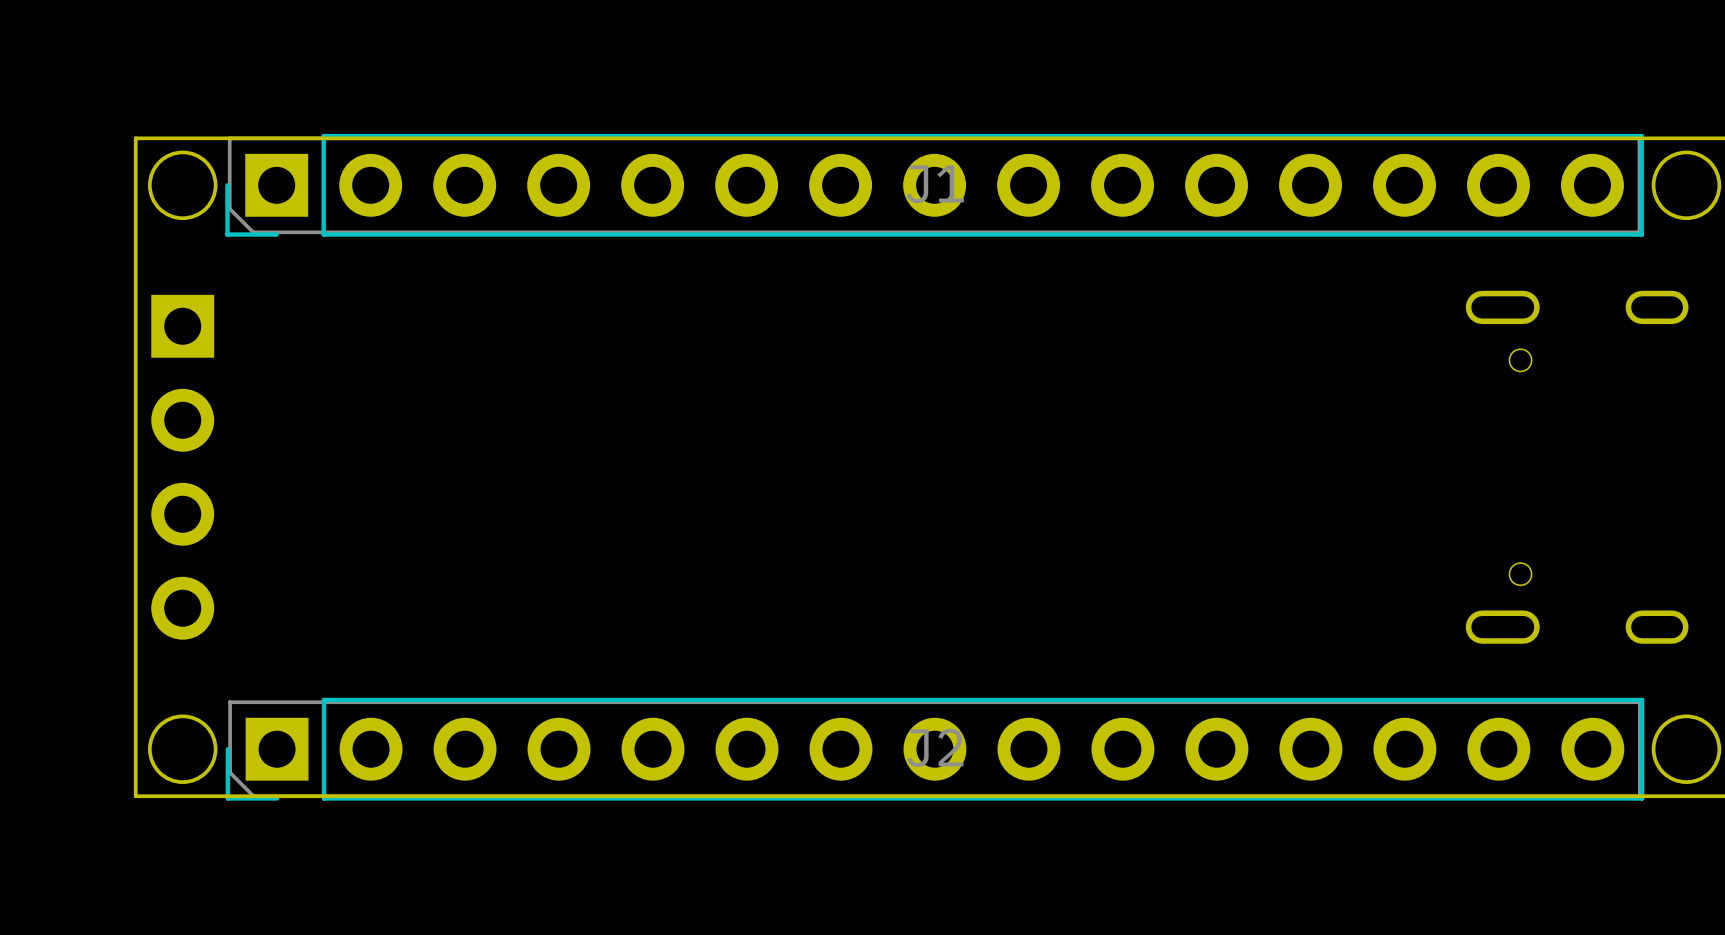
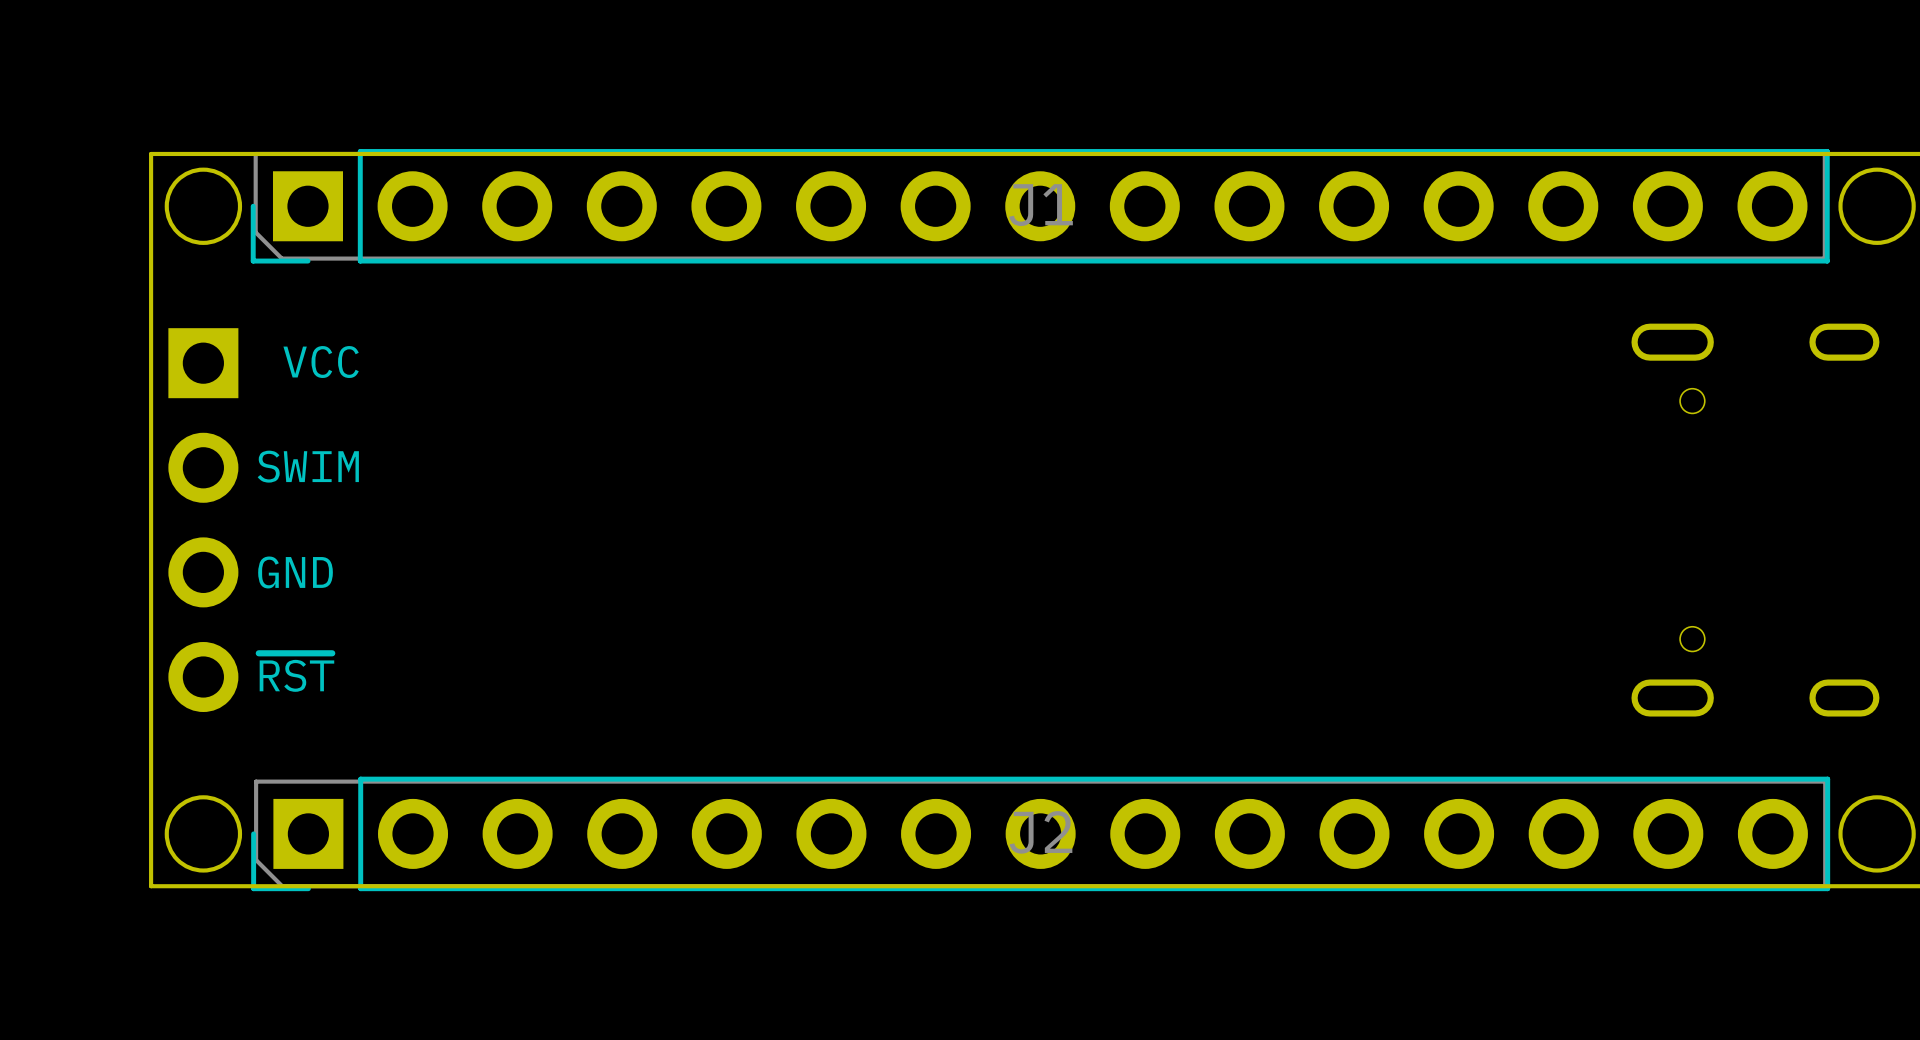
text: none -> VCC (321, 362)
text: none -> SWIM (308, 466)
text: none -> GND (295, 572)
text: none -> ~{RST} (296, 672)

